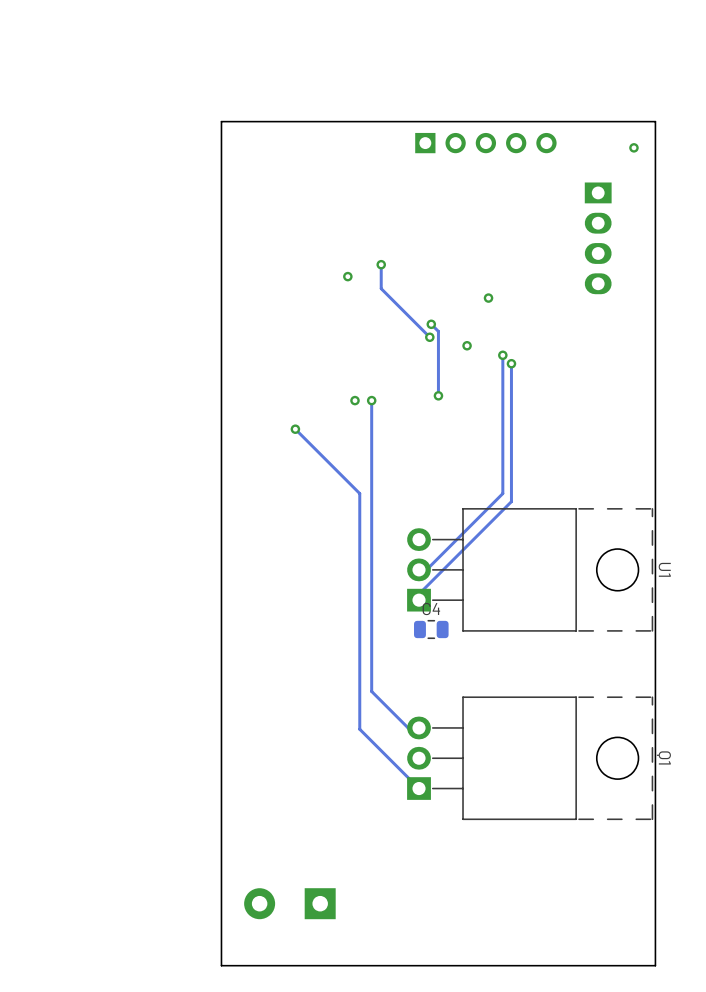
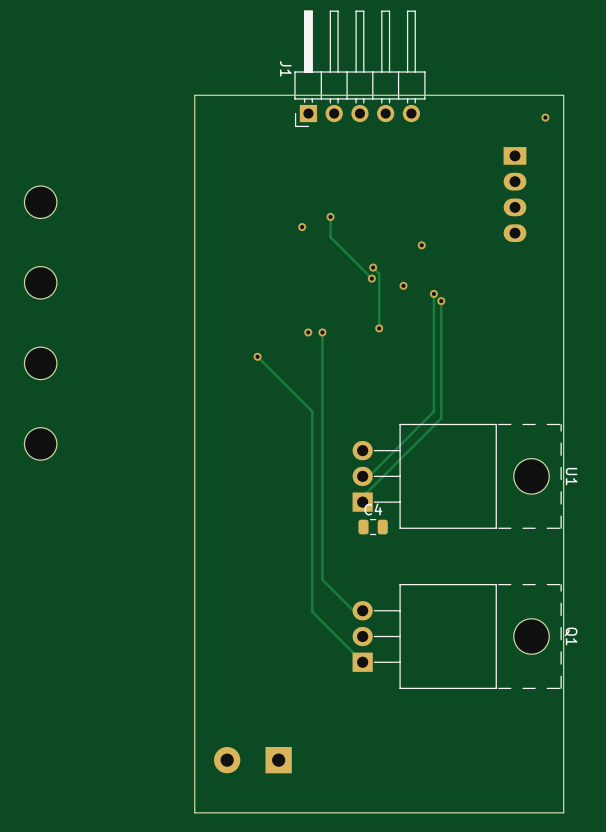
J1 side: top (485, 143) -> bottom (359, 68)
part: none -> (40, 202)
part: none -> (40, 282)
part: none -> (40, 363)
part: none -> (40, 443)

